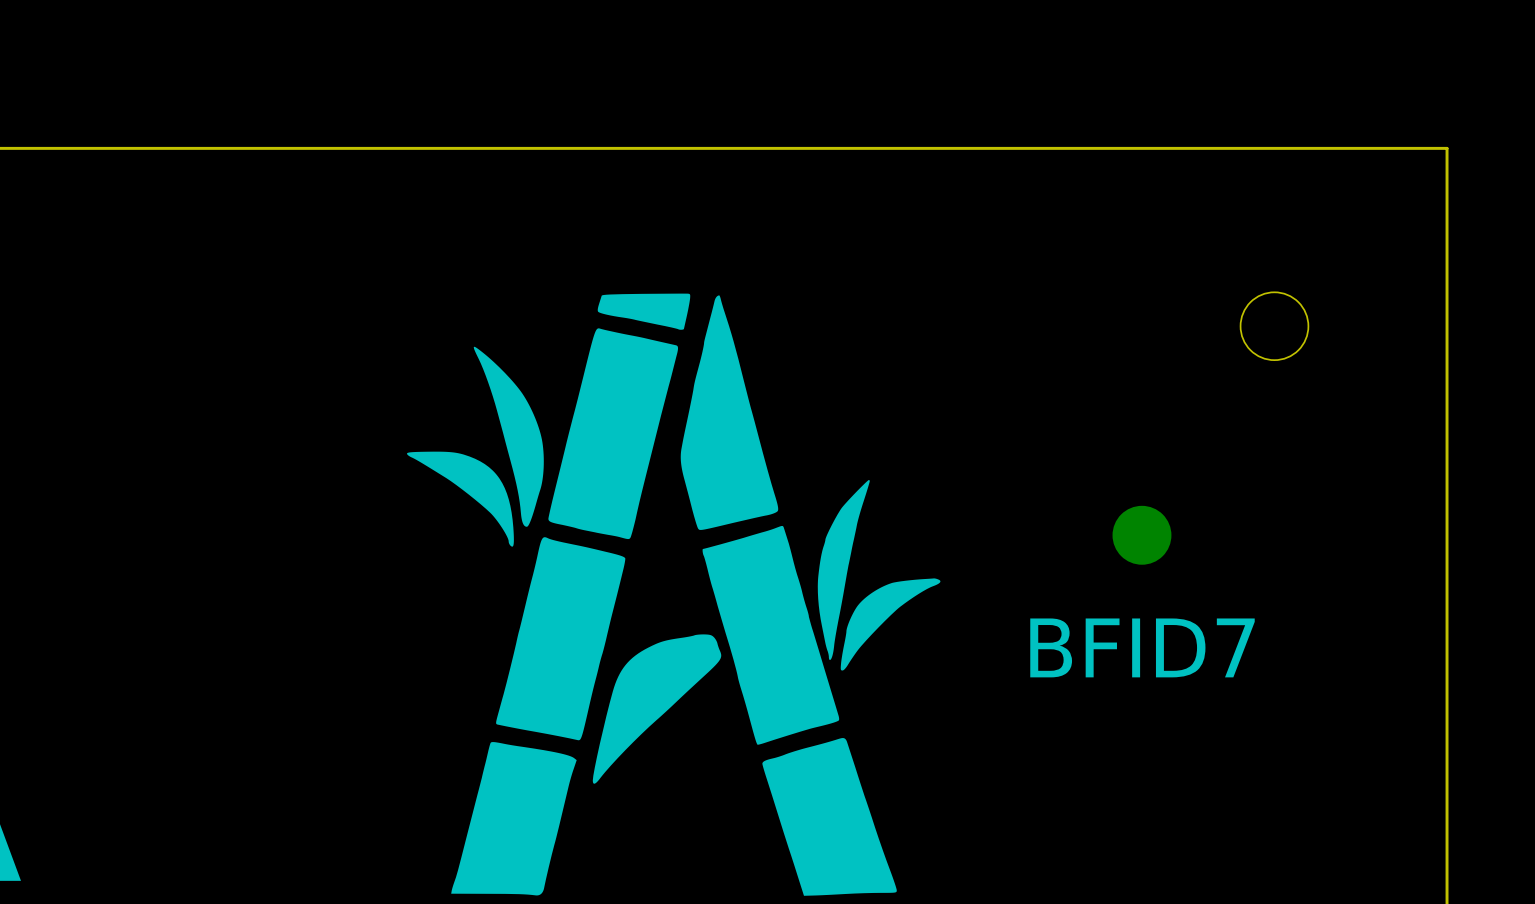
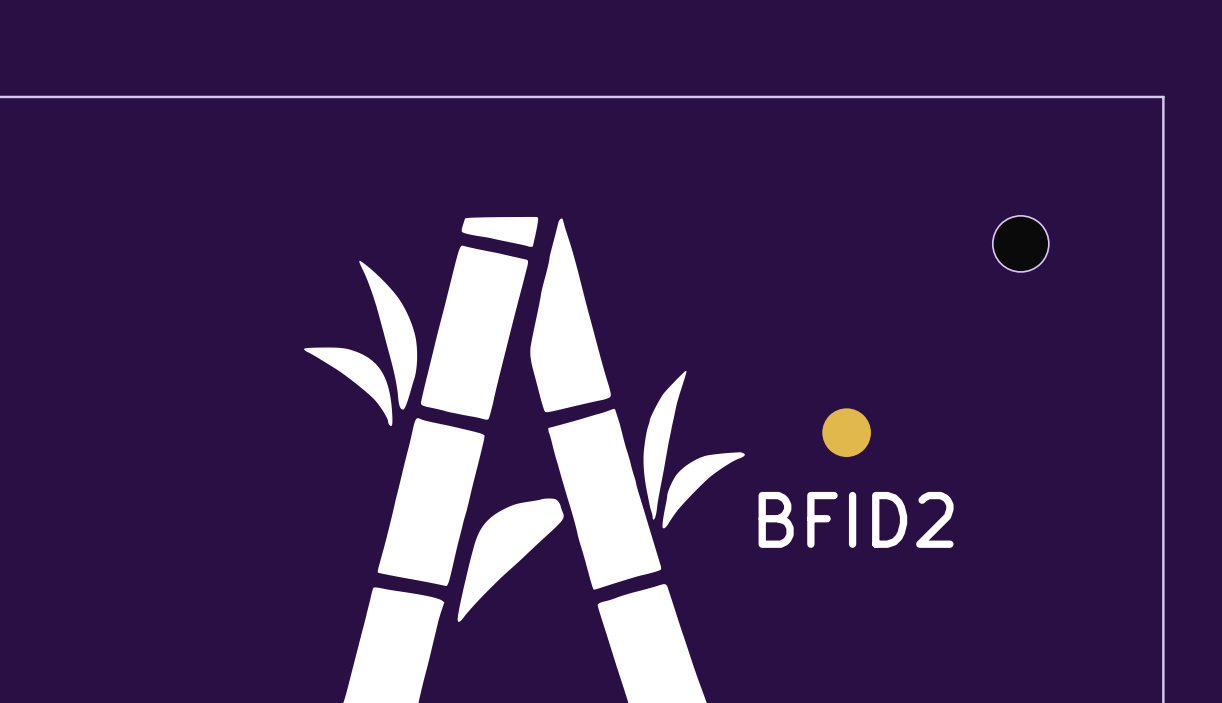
BFID7: (1141, 535) -> none
BFID2: none -> (846, 432)

